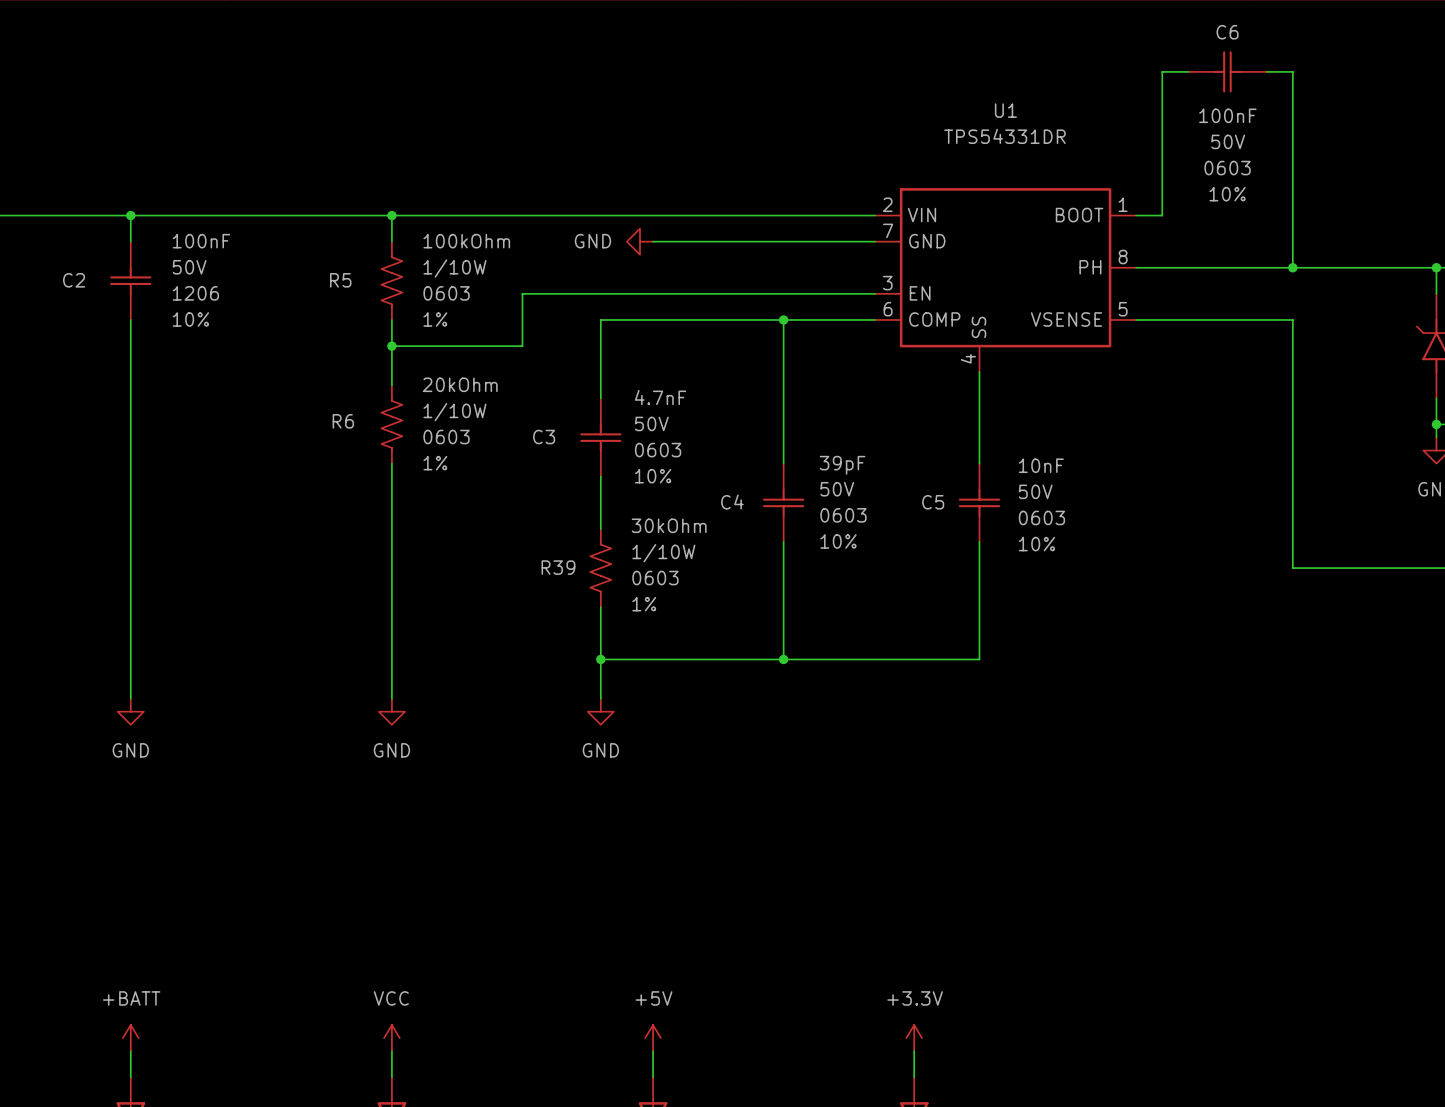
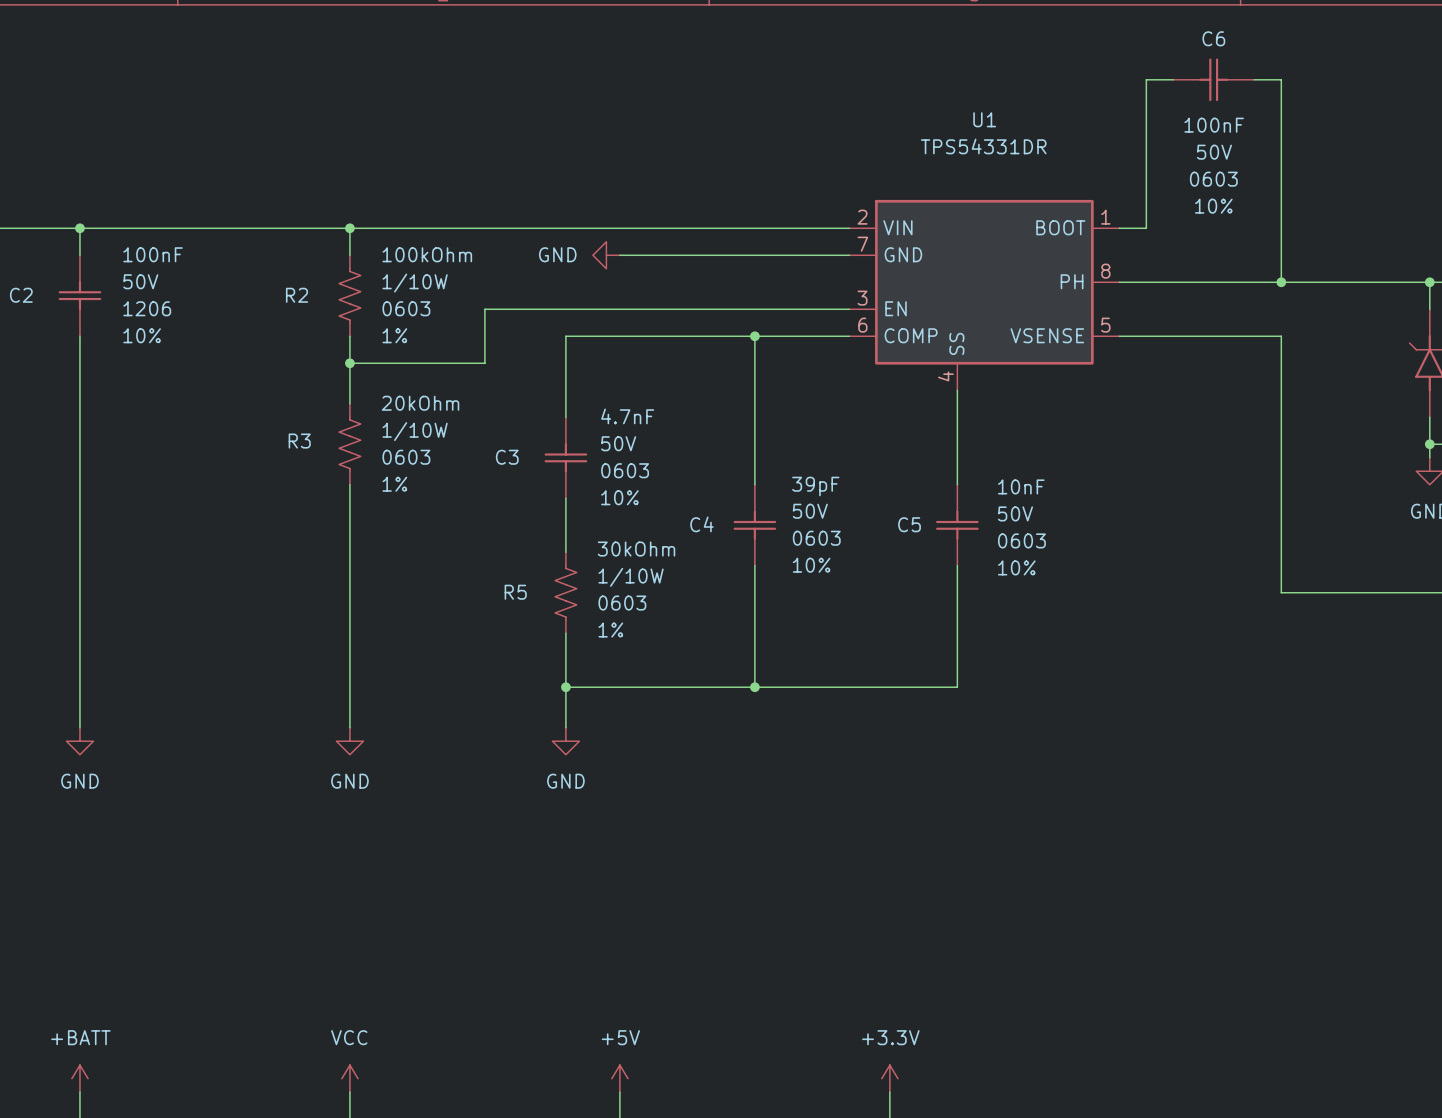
R5 name: R5 (340, 280) -> R2 (297, 295)
R6 name: R6 (343, 421) -> R3 (299, 441)
R39 name: R39 (558, 567) -> R5 (515, 592)

